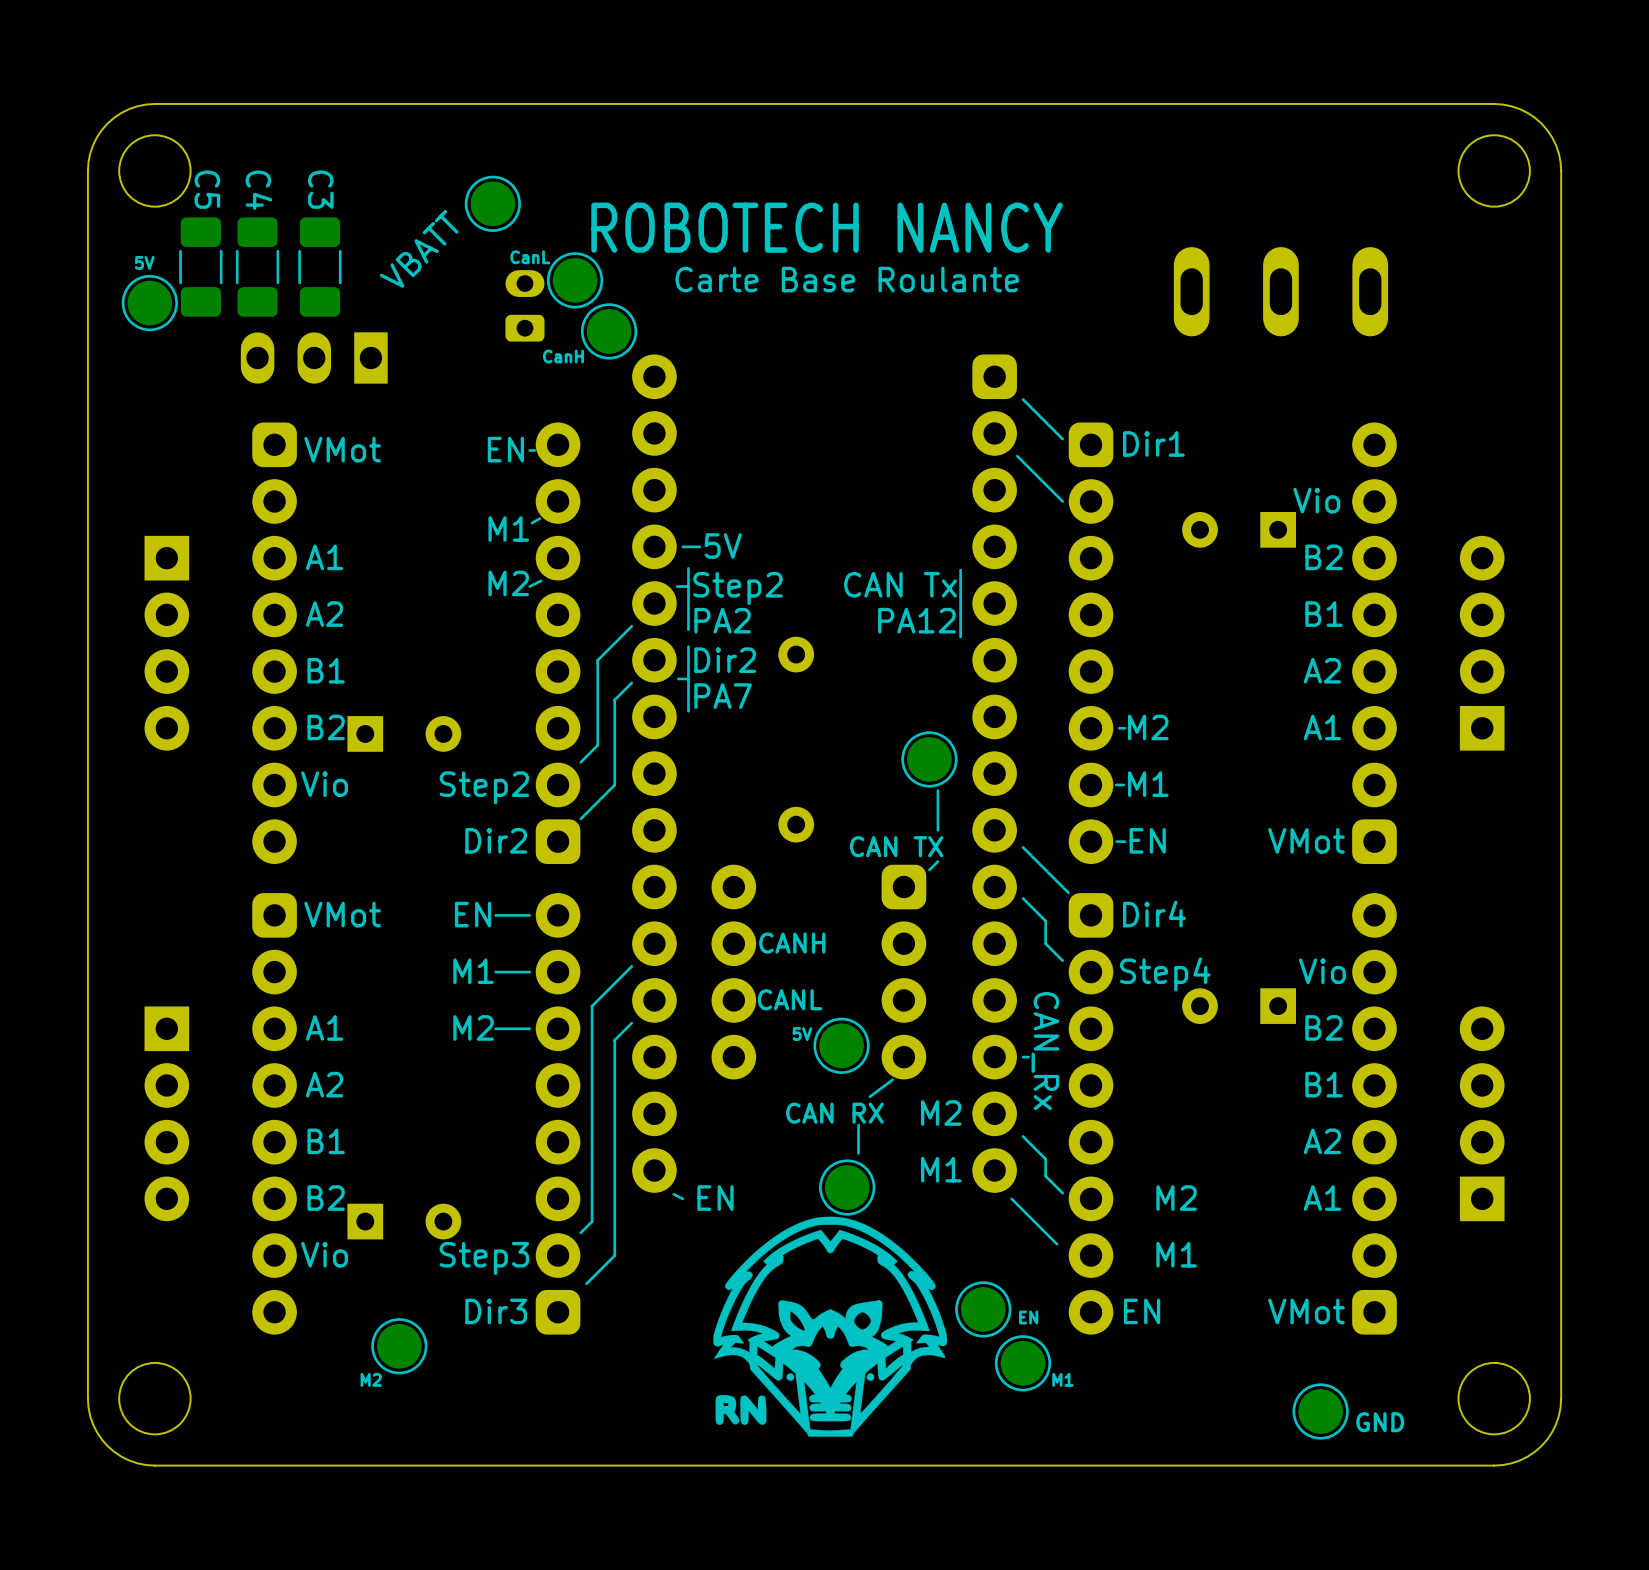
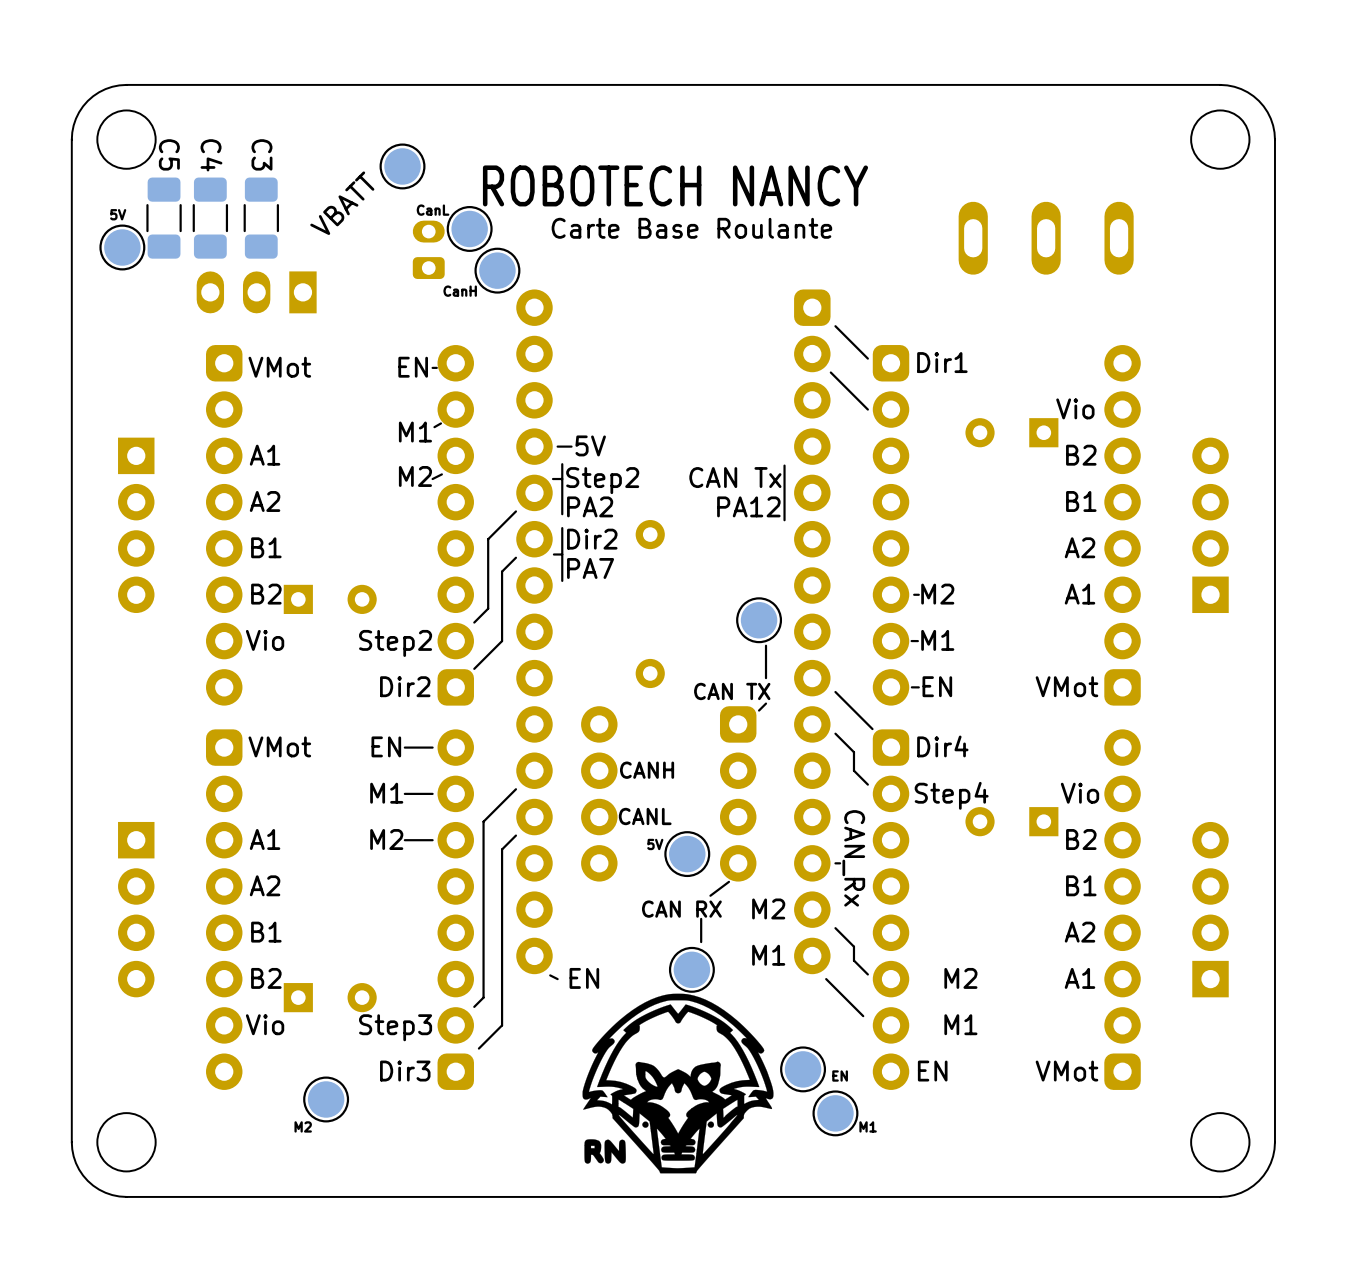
part: (1320, 1411) -> none
text: GND (1380, 1422) -> none

